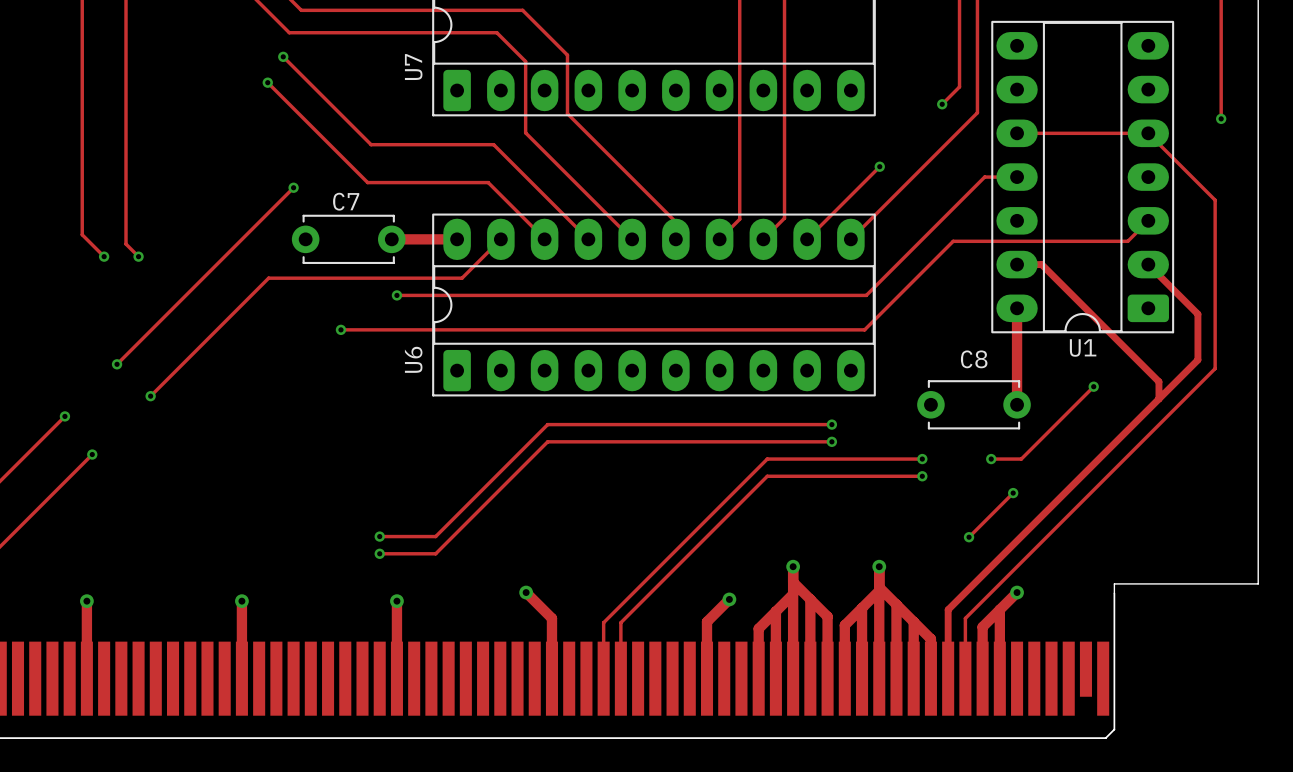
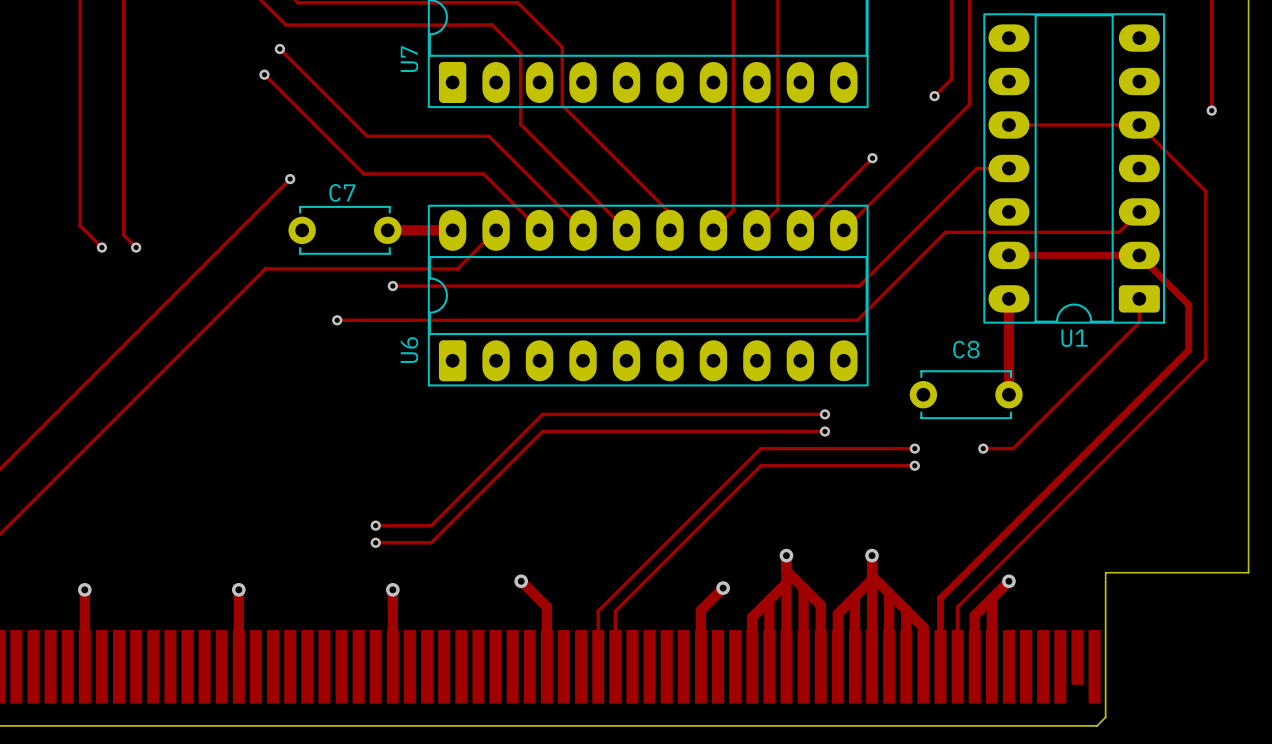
track: (1041, 264) (1158, 381) (1158, 398) -> (1033, 255) (1139, 255)
track: none -> (1139, 298) (1139, 322) (1085, 376)
track: none -> (114, 354) (62, 406)
via: (117, 364) -> none
via: (1093, 386) -> none
track: none -> (148, 386) (90, 444)
via: (150, 396) -> none
via: (64, 416) -> none
via: (92, 454) -> none
track: (1013, 493) (969, 537) -> none
via: (1013, 493) -> none
via: (969, 537) -> none

